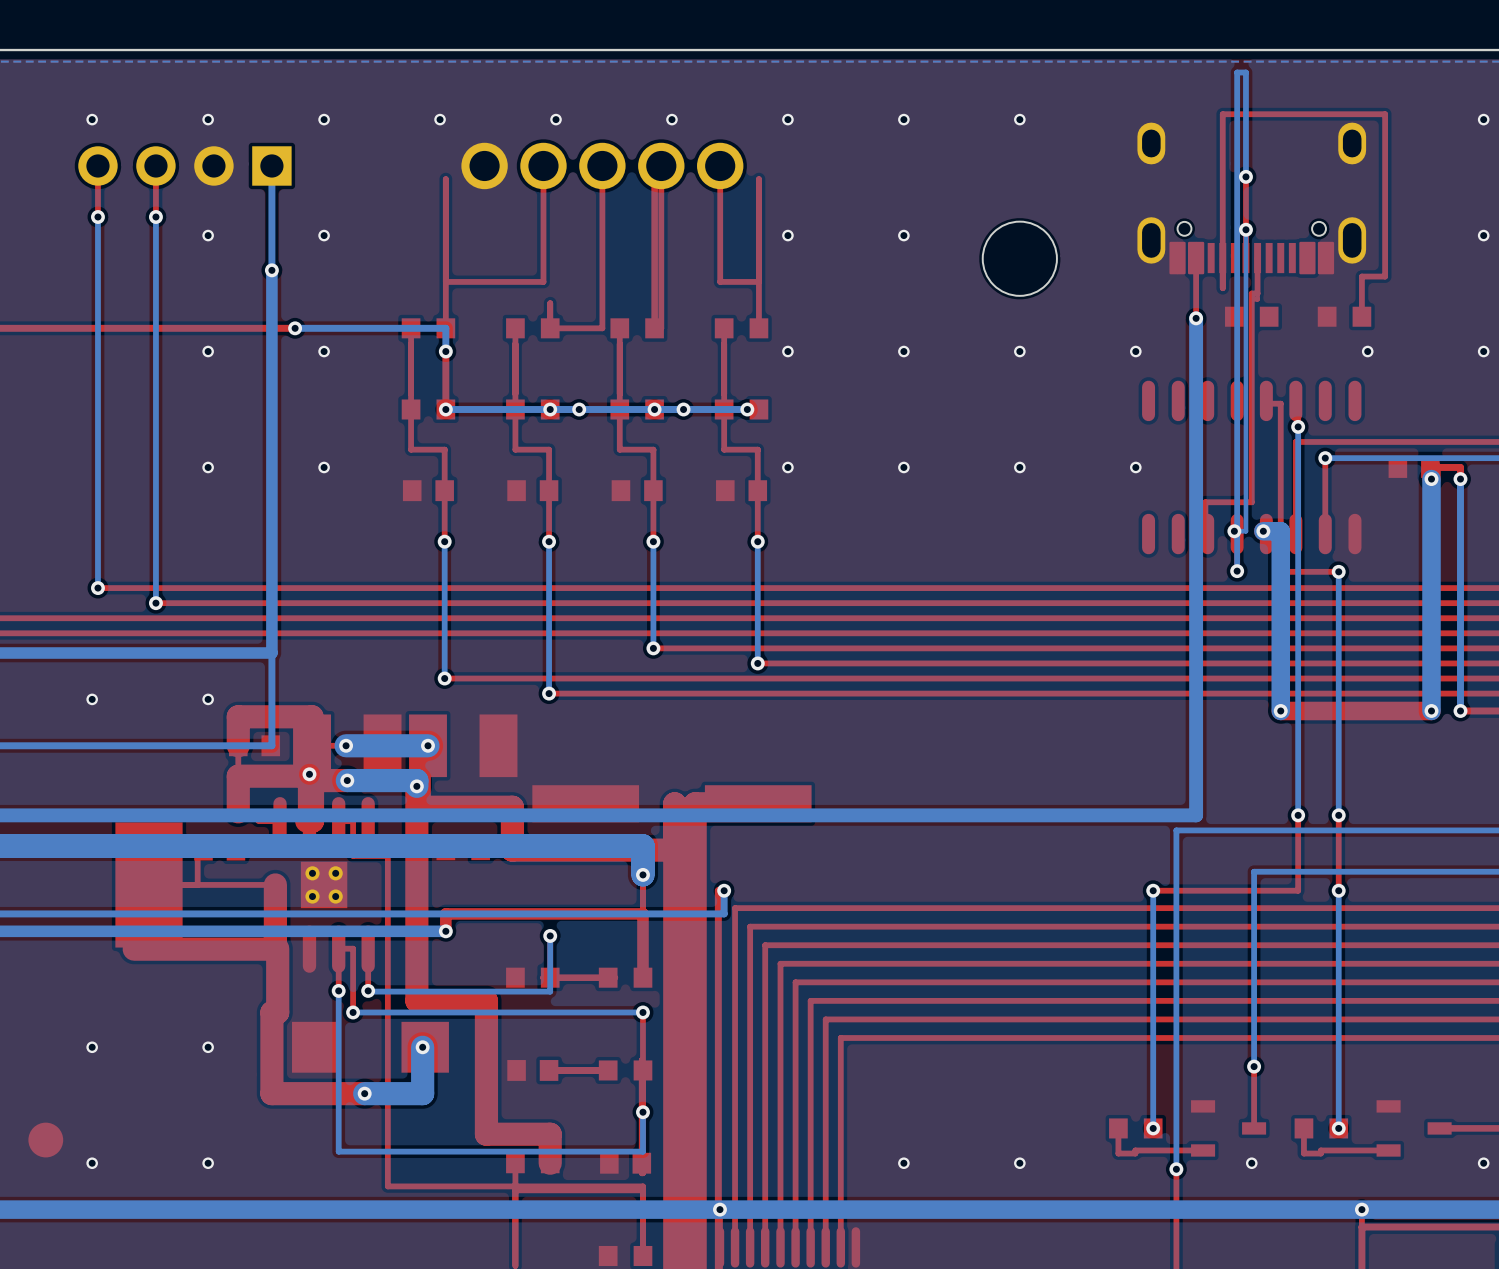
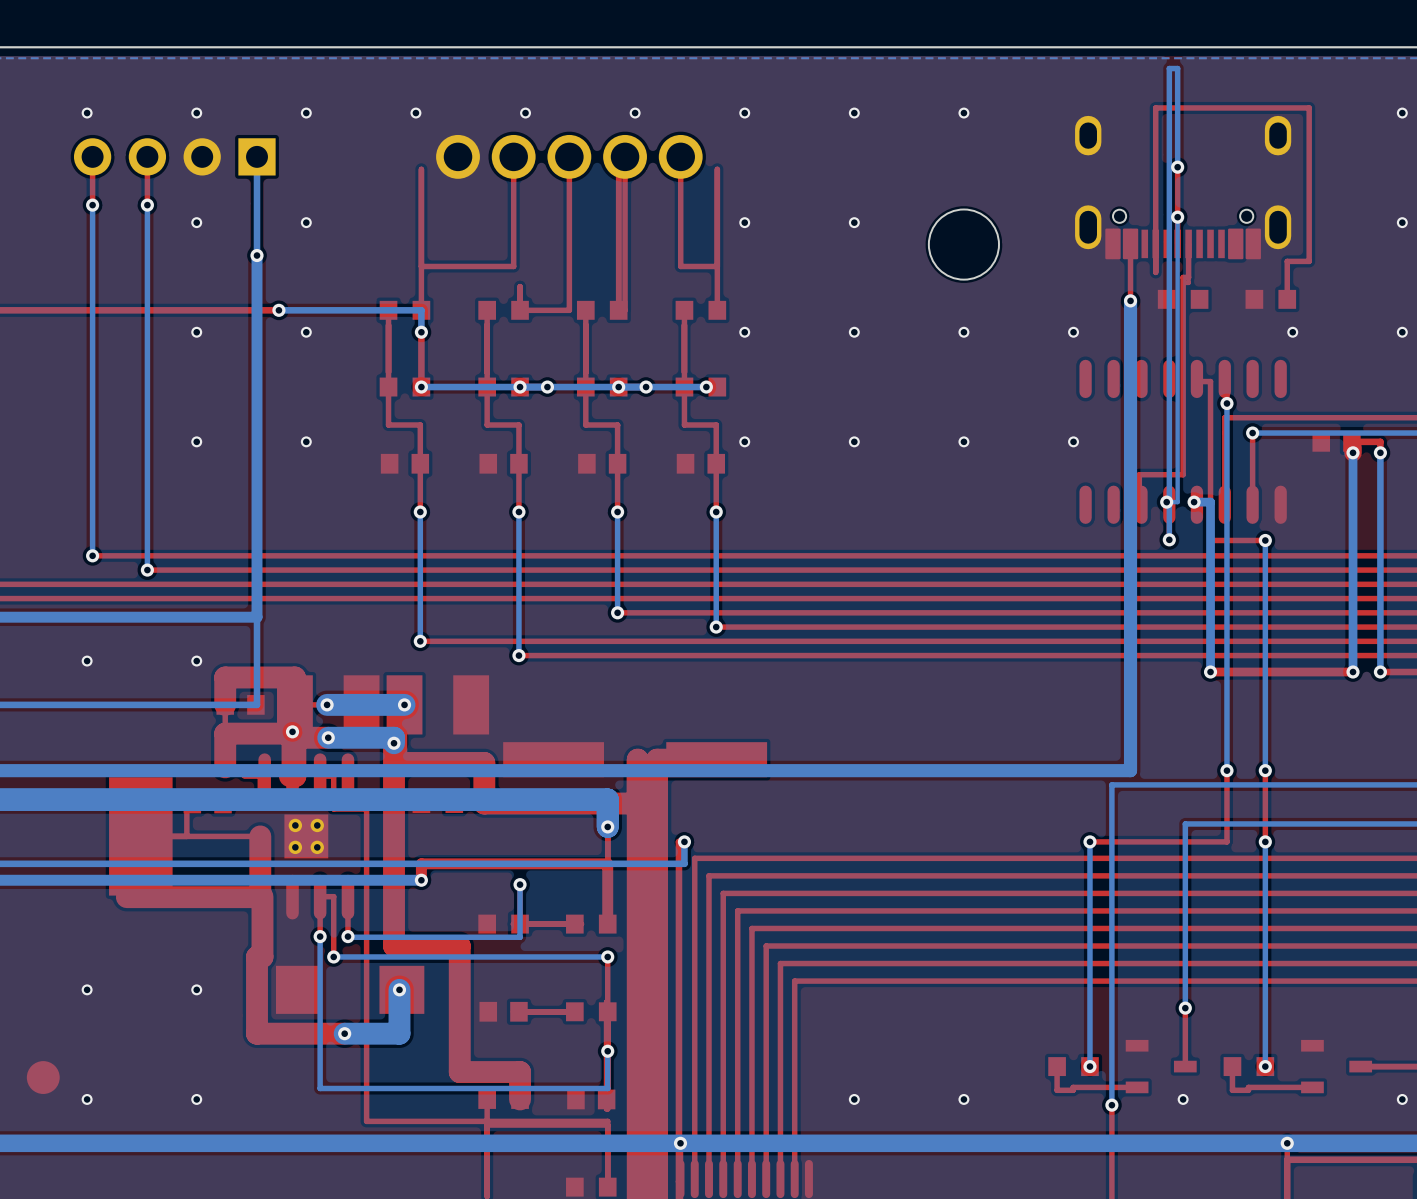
bottom track width: thick (1431, 479) (1431, 710) -> thin (1353, 452) (1353, 672)
bottom track width: thick (1263, 531) (1280, 531) (1280, 710) -> thin (1194, 502) (1210, 502) (1210, 672)
top track width: thick (1431, 710) (1280, 710) -> thin (1353, 672) (1210, 672)

